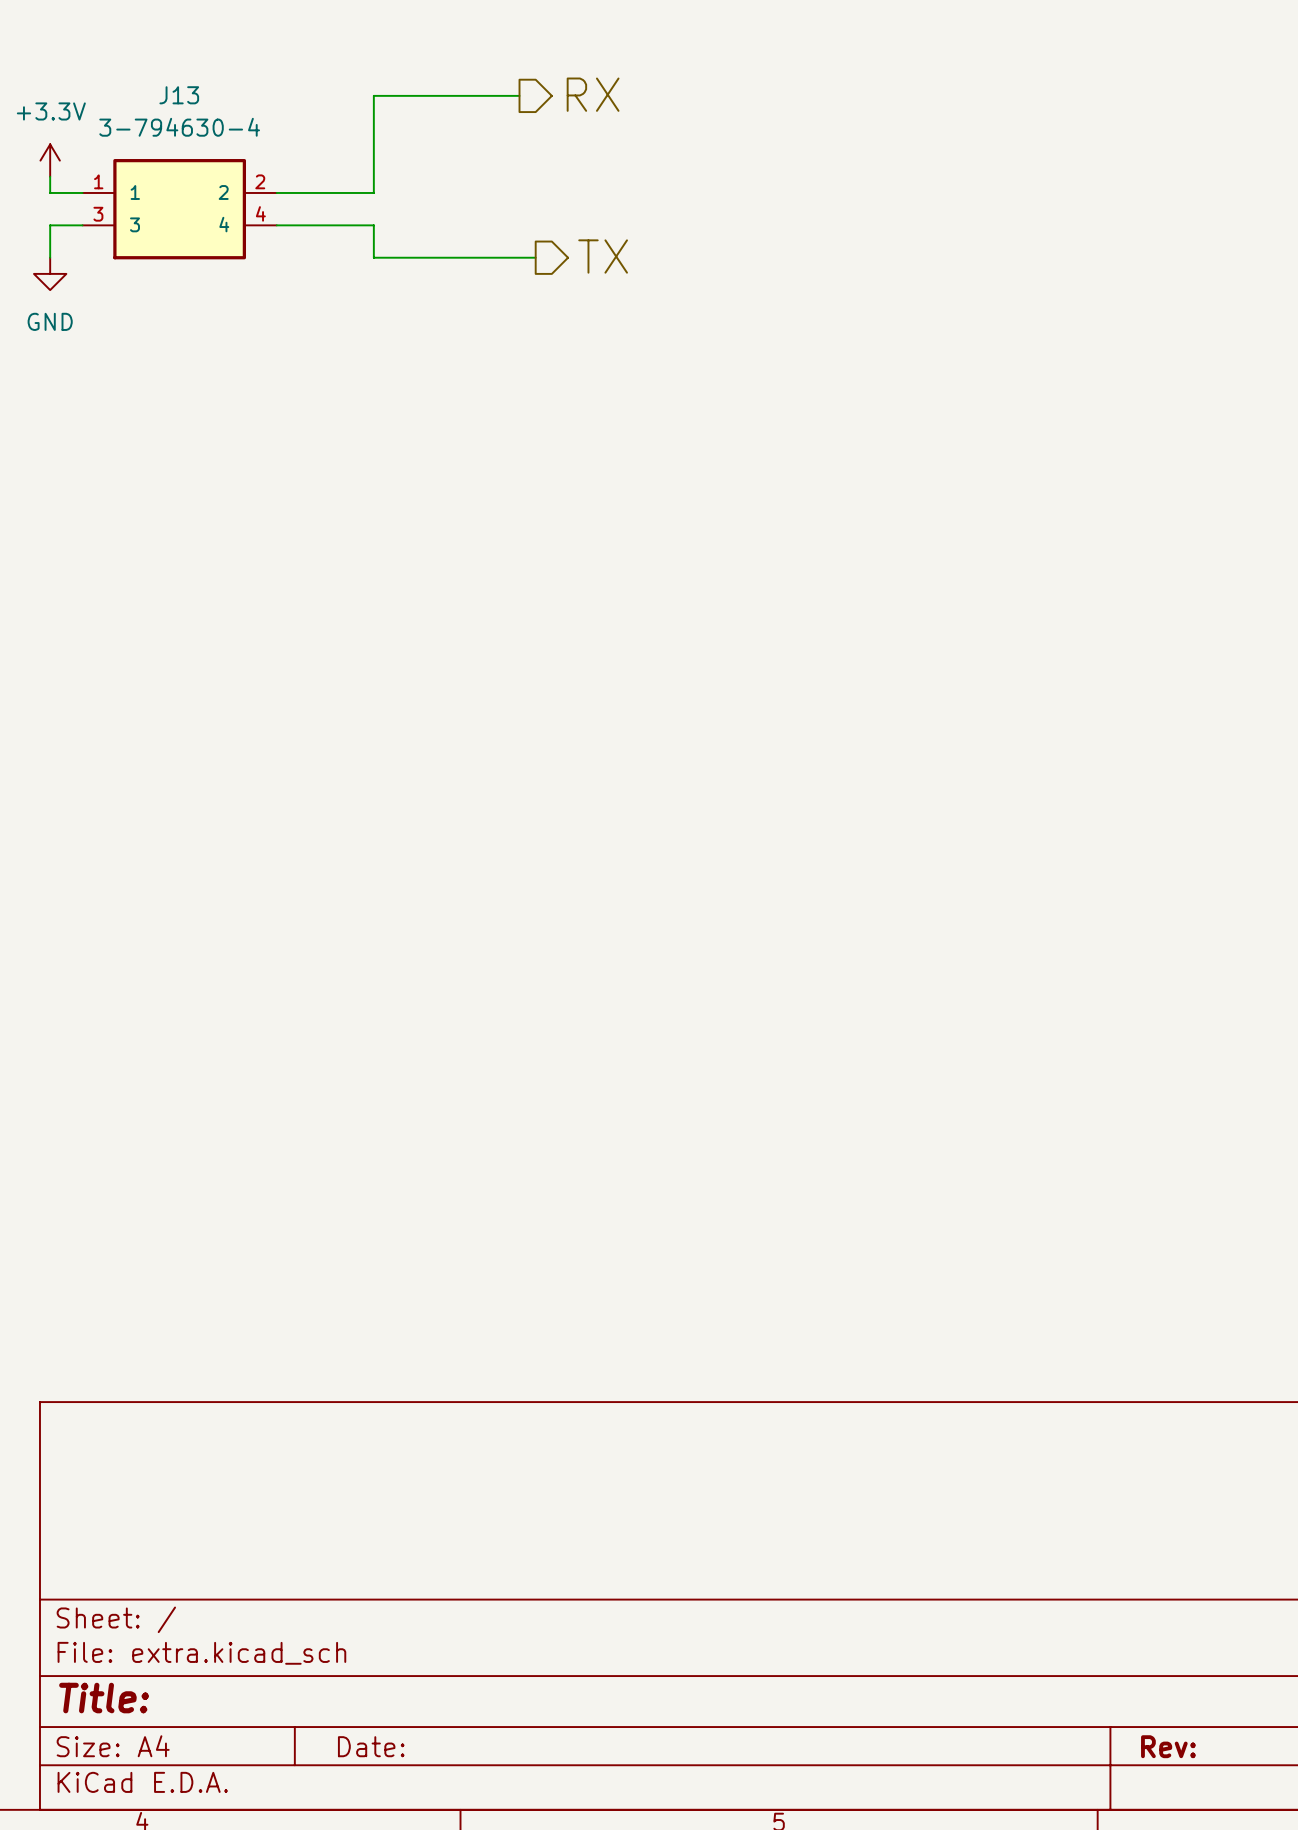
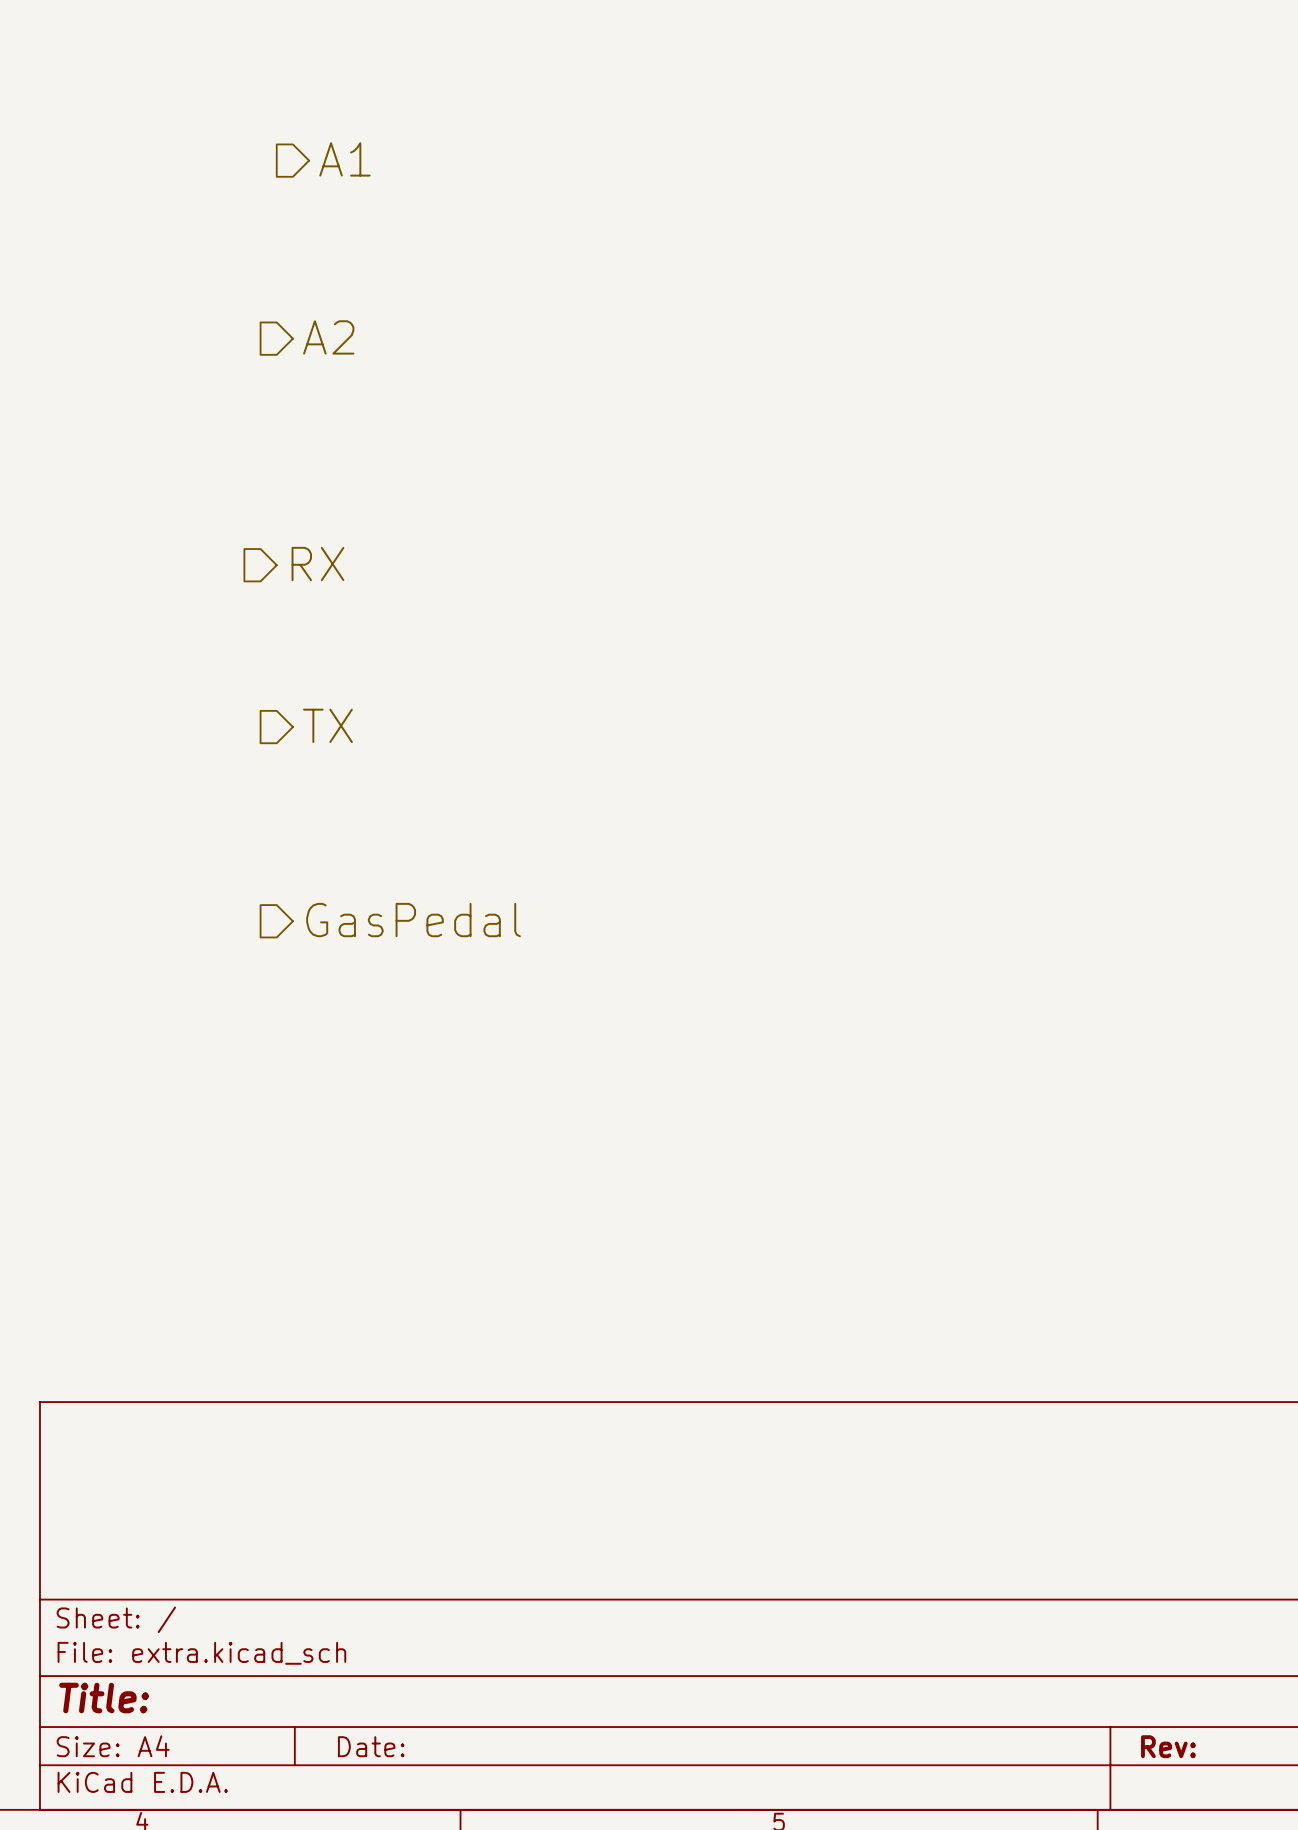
hierarchical label: RX (593, 94) -> none
wire: (519, 95) (373, 95) (373, 192) (276, 192) -> none
hierarchical label: none -> A1 (344, 159)
power symbol: +3.3V (50, 160) -> none
wire: (50, 176) (50, 192) (82, 192) -> none
J13: 3-794630-4 (179, 209) -> none
wire: (82, 225) (50, 225) (50, 257) -> none
wire: (276, 225) (373, 225) (373, 257) (535, 257) -> none
hierarchical label: TX (603, 256) -> none
power symbol: GND (50, 273) -> none
hierarchical label: none -> A2 (328, 337)
hierarchical label: none -> RX (317, 564)
hierarchical label: none -> TX (327, 725)
hierarchical label: none -> GasPedal (413, 920)

